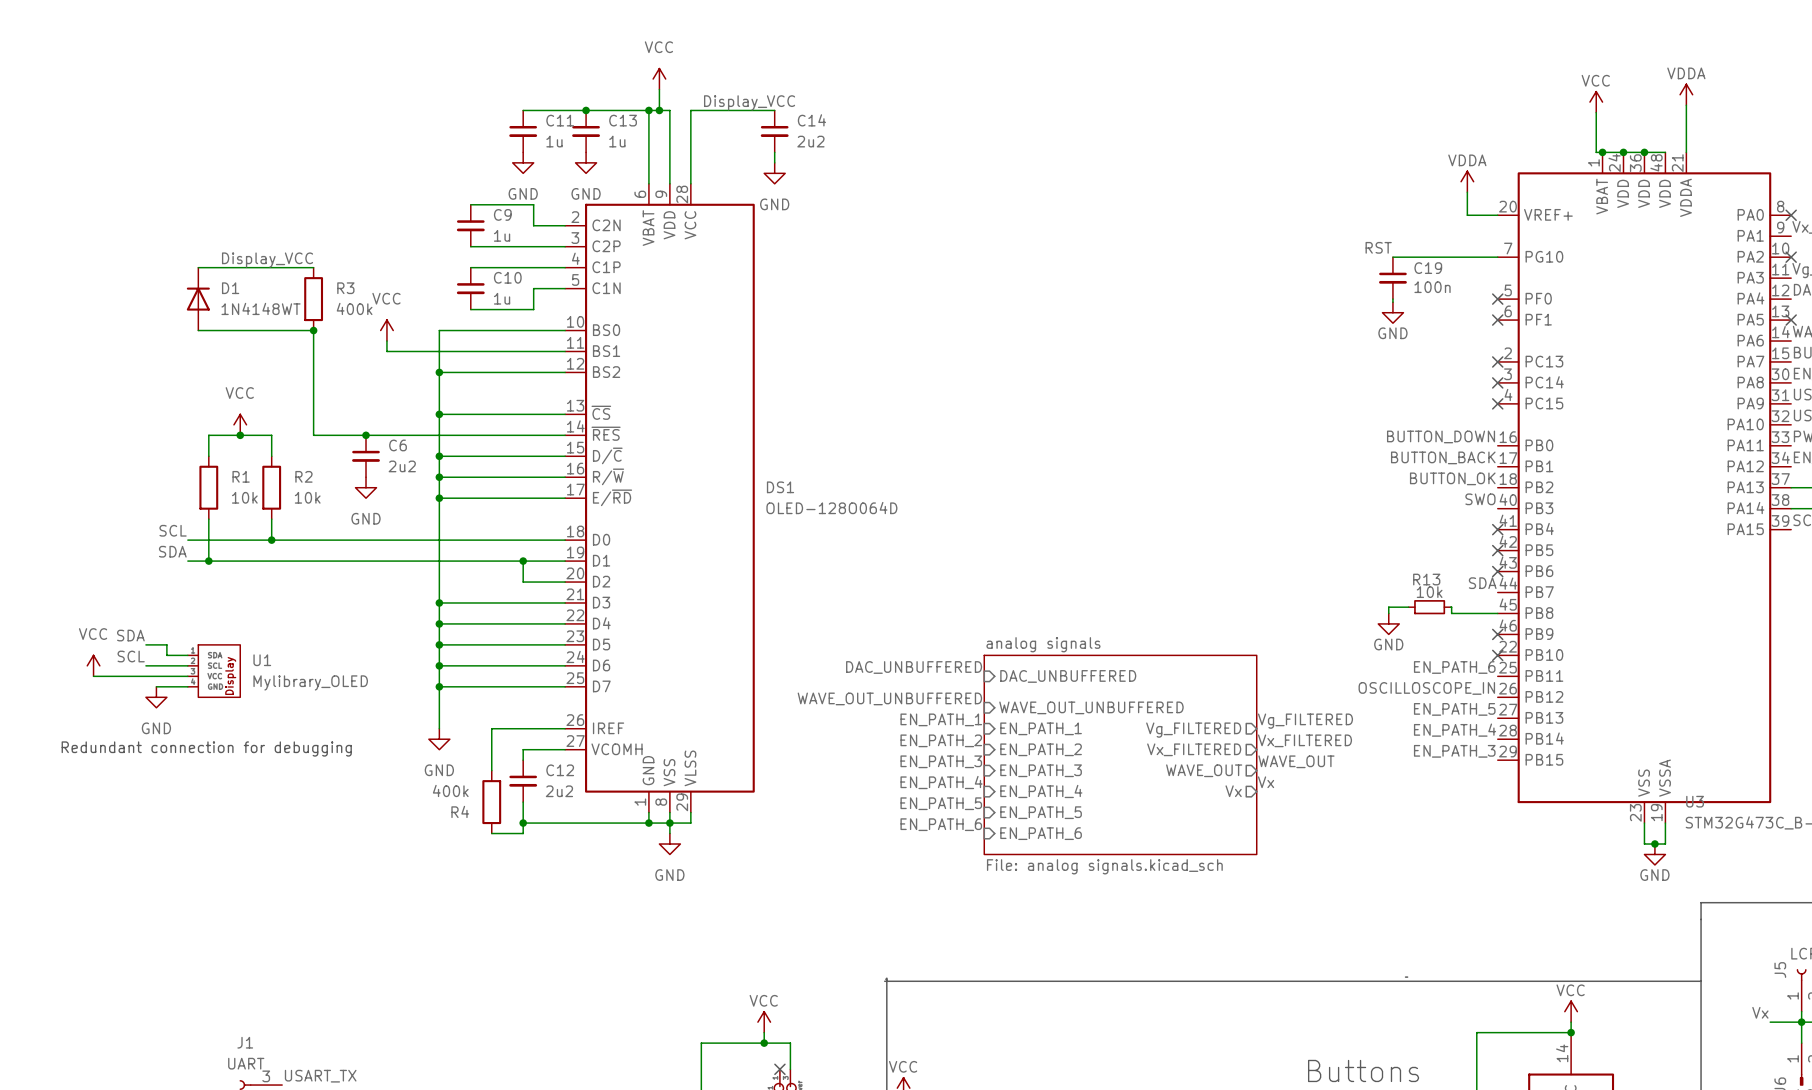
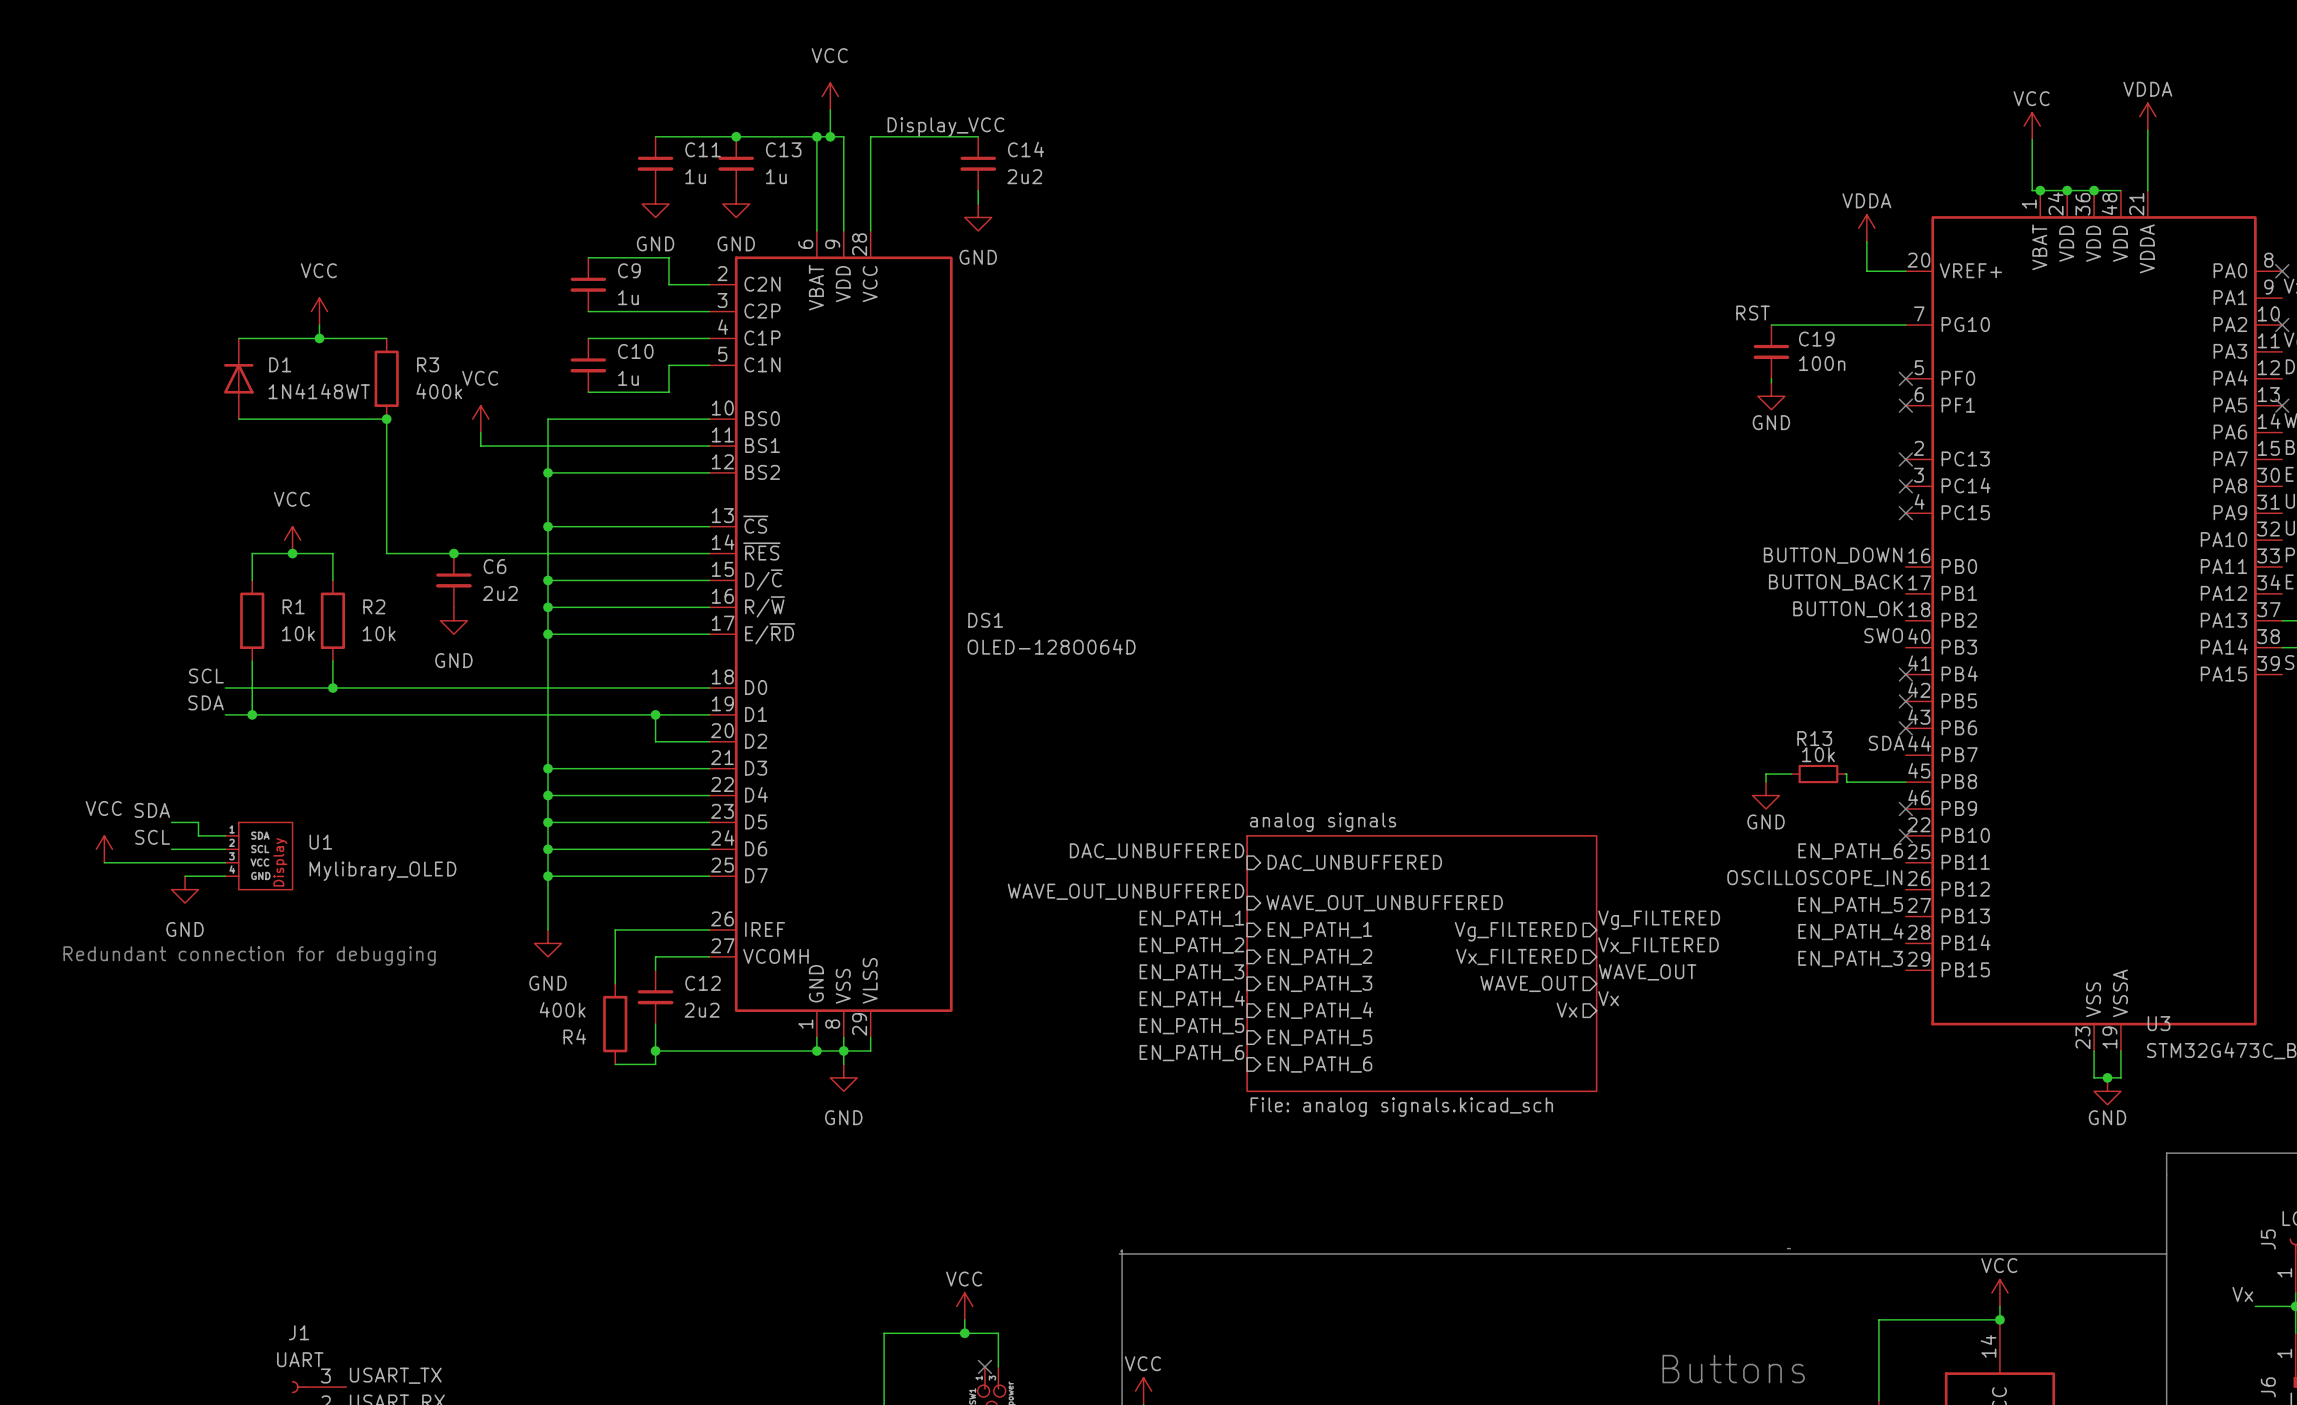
power symbol: none -> VCC (319, 311)
label: Display_VCC (267, 260) -> none
junction: none -> (319, 338)

